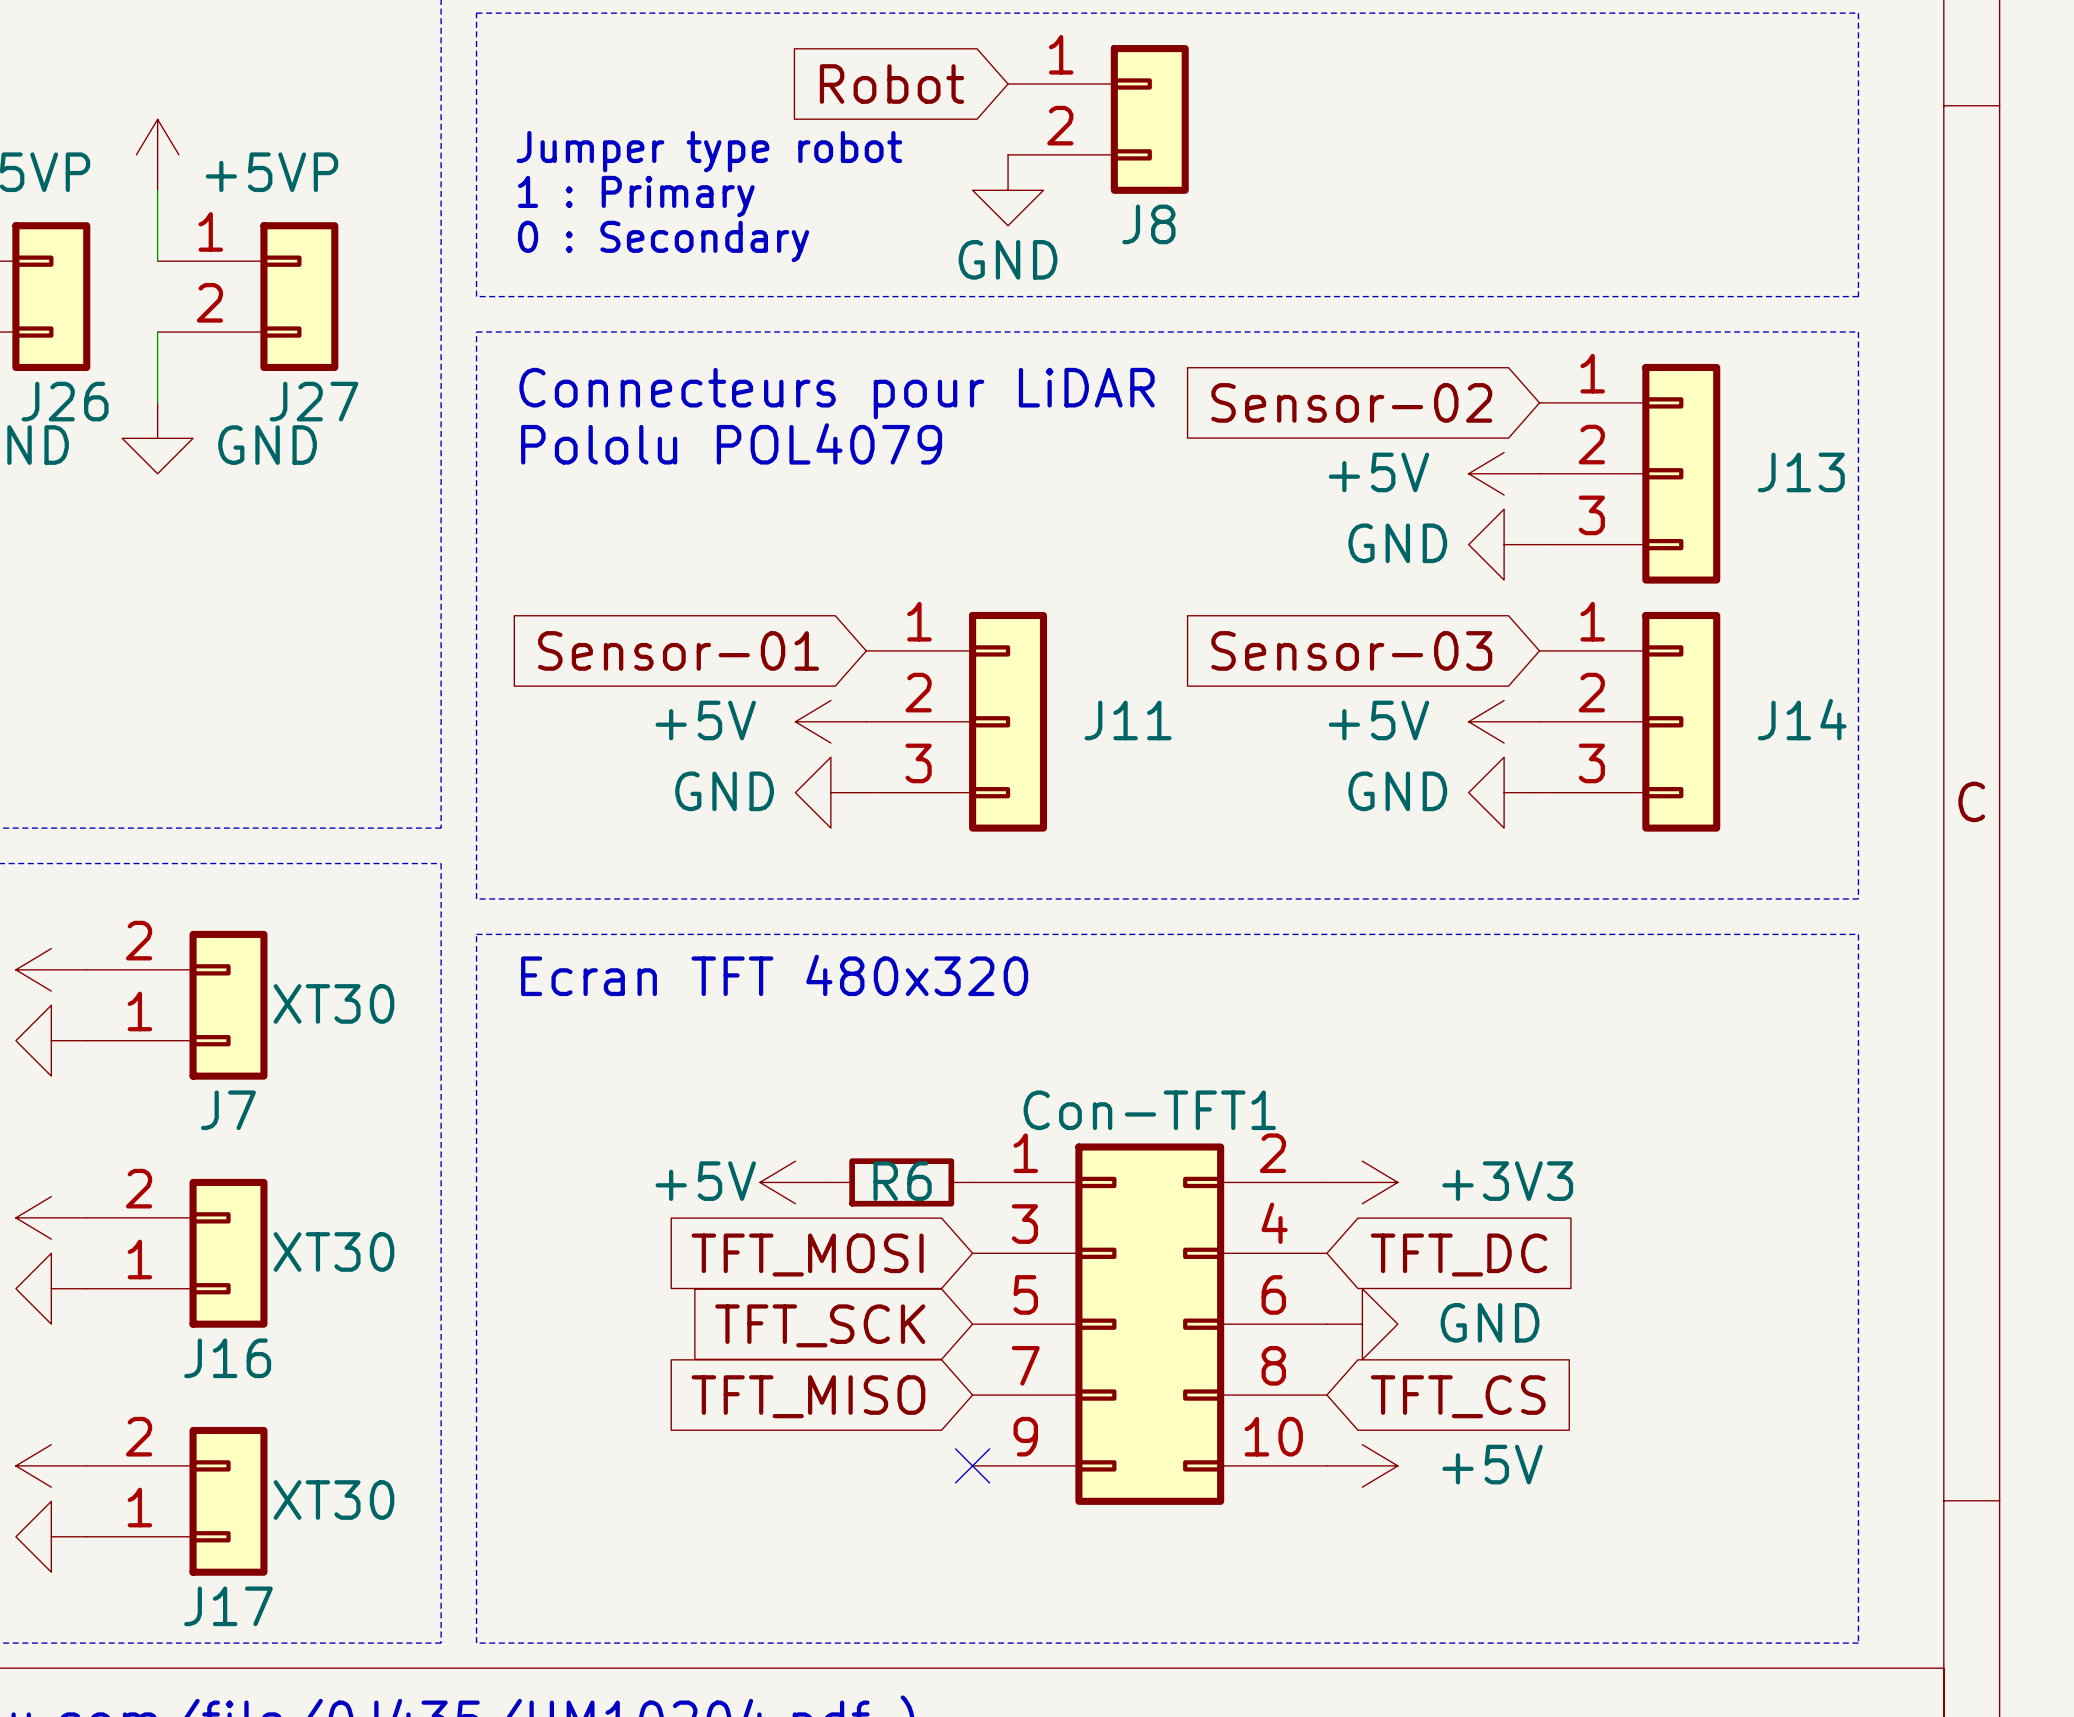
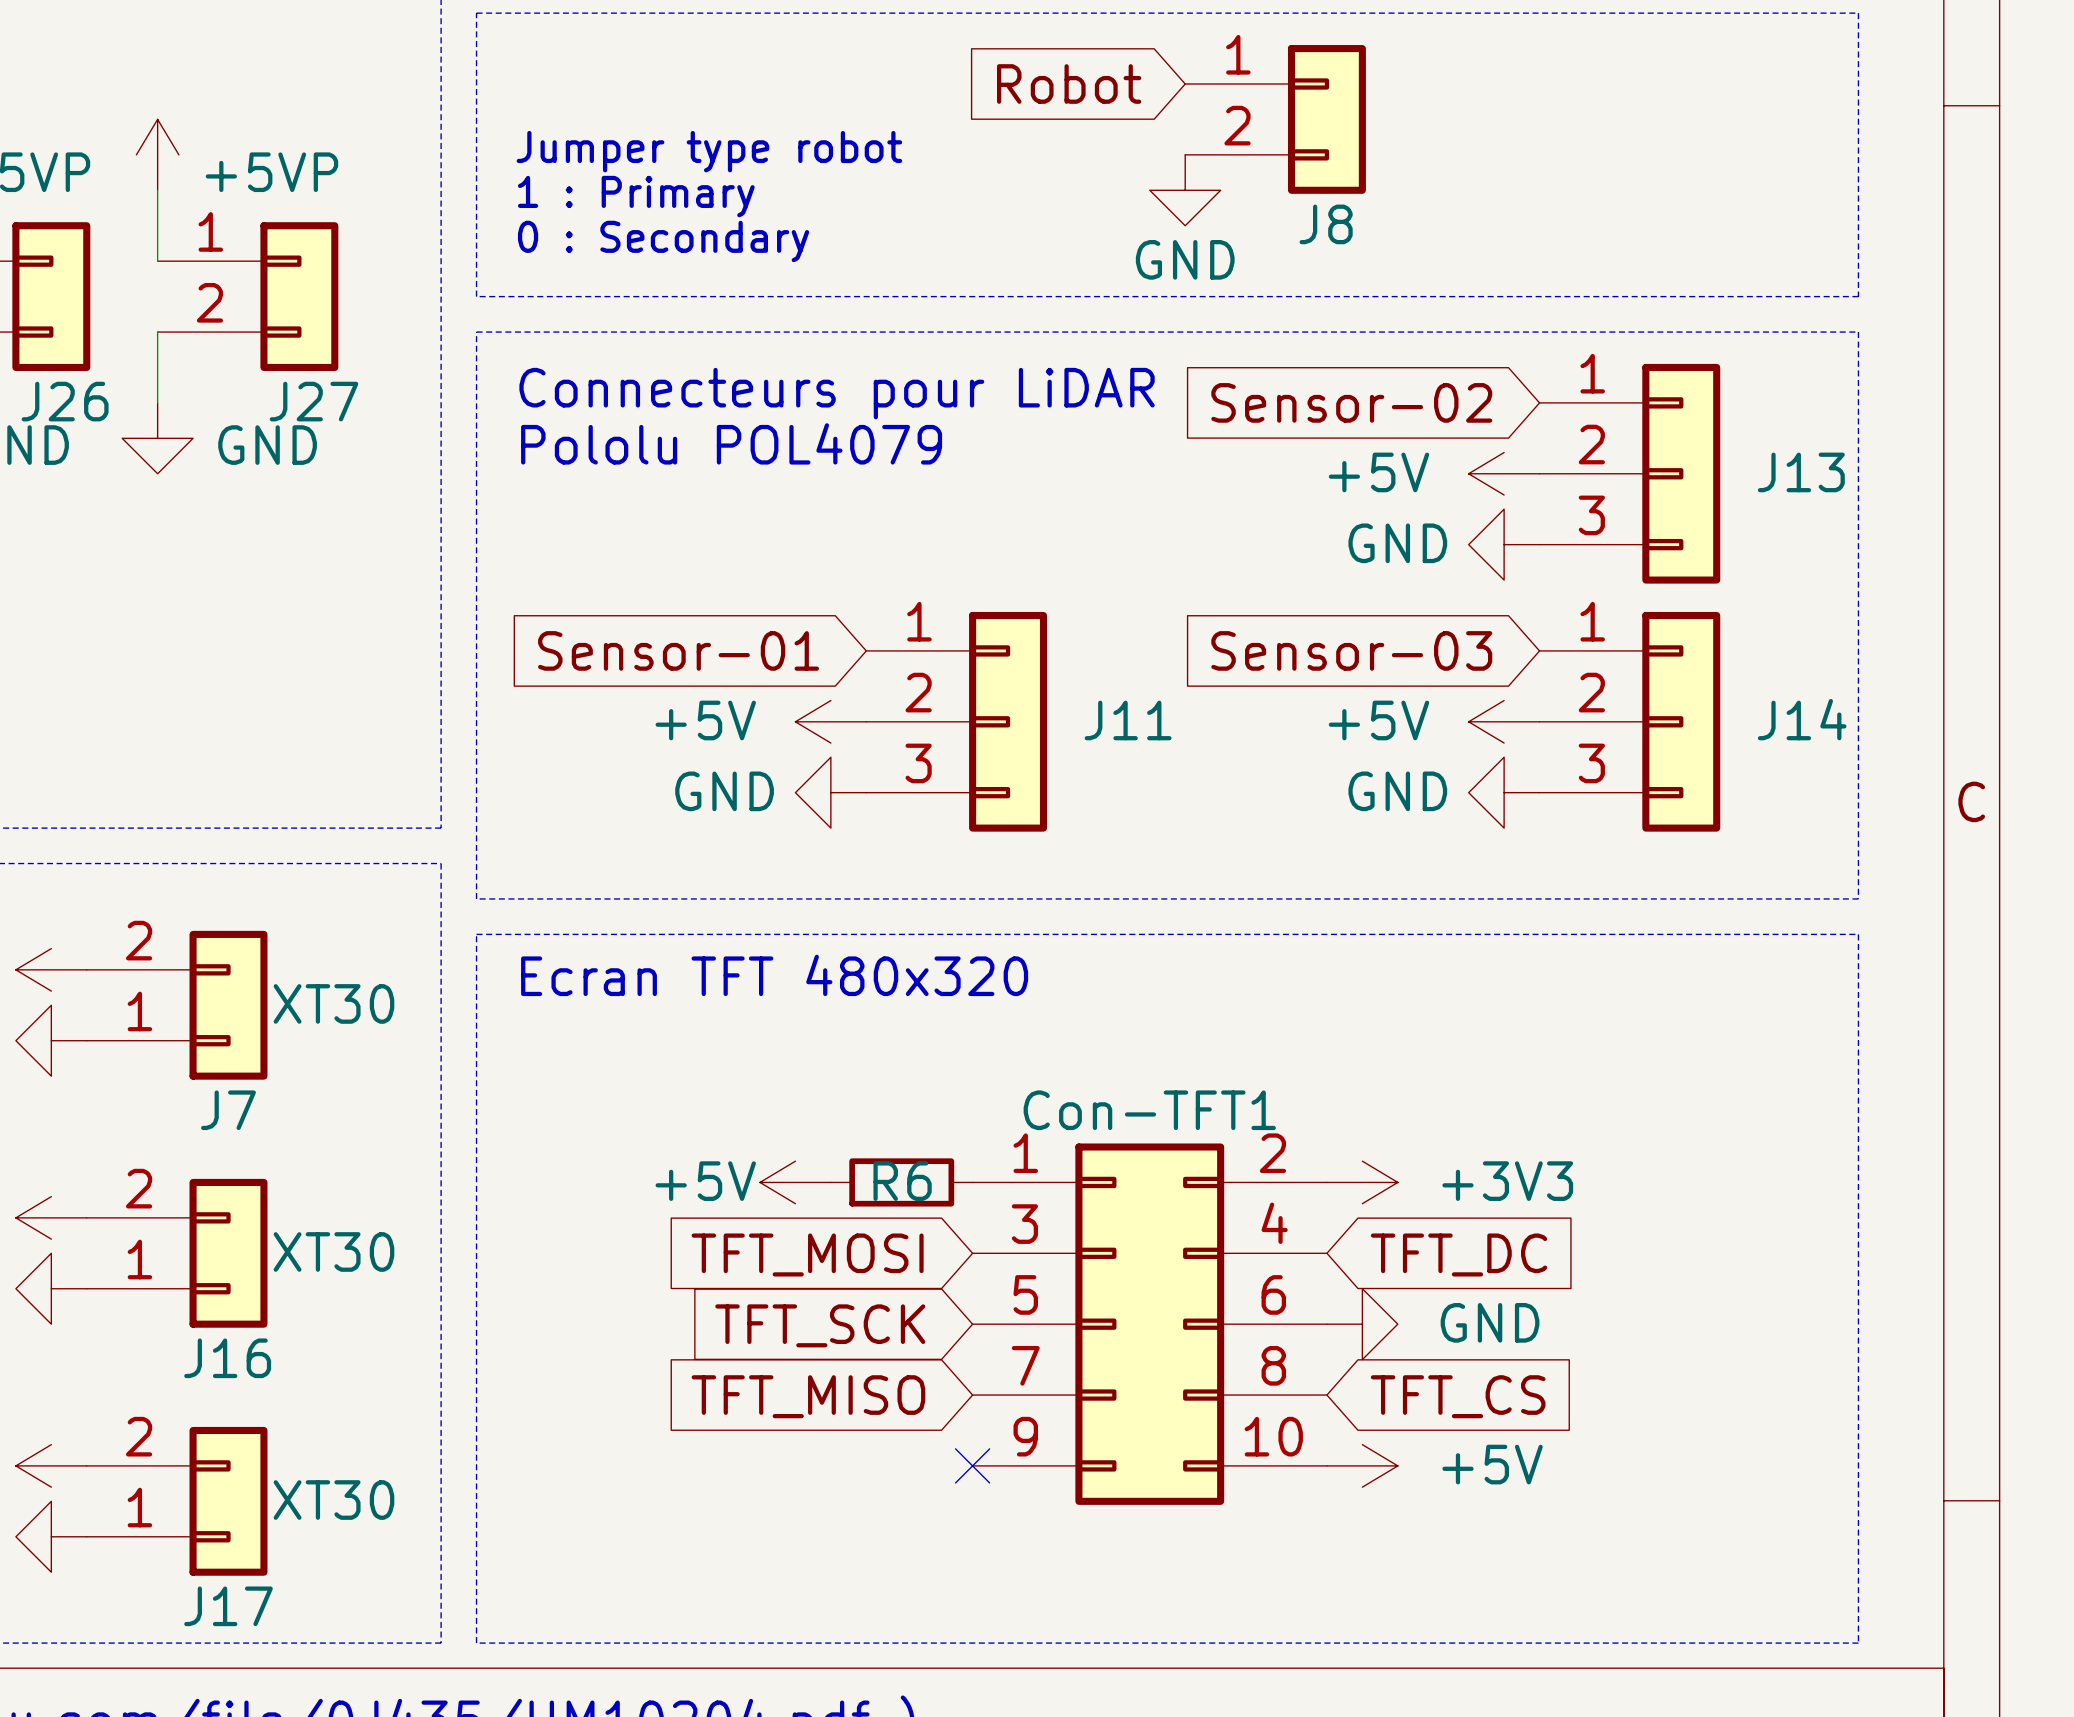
global label position: Robot (891, 84) -> Robot (1069, 84)
J8 position: (1098, 119) -> (1275, 119)
power symbol position: GND (1008, 190) -> GND (1185, 190)

